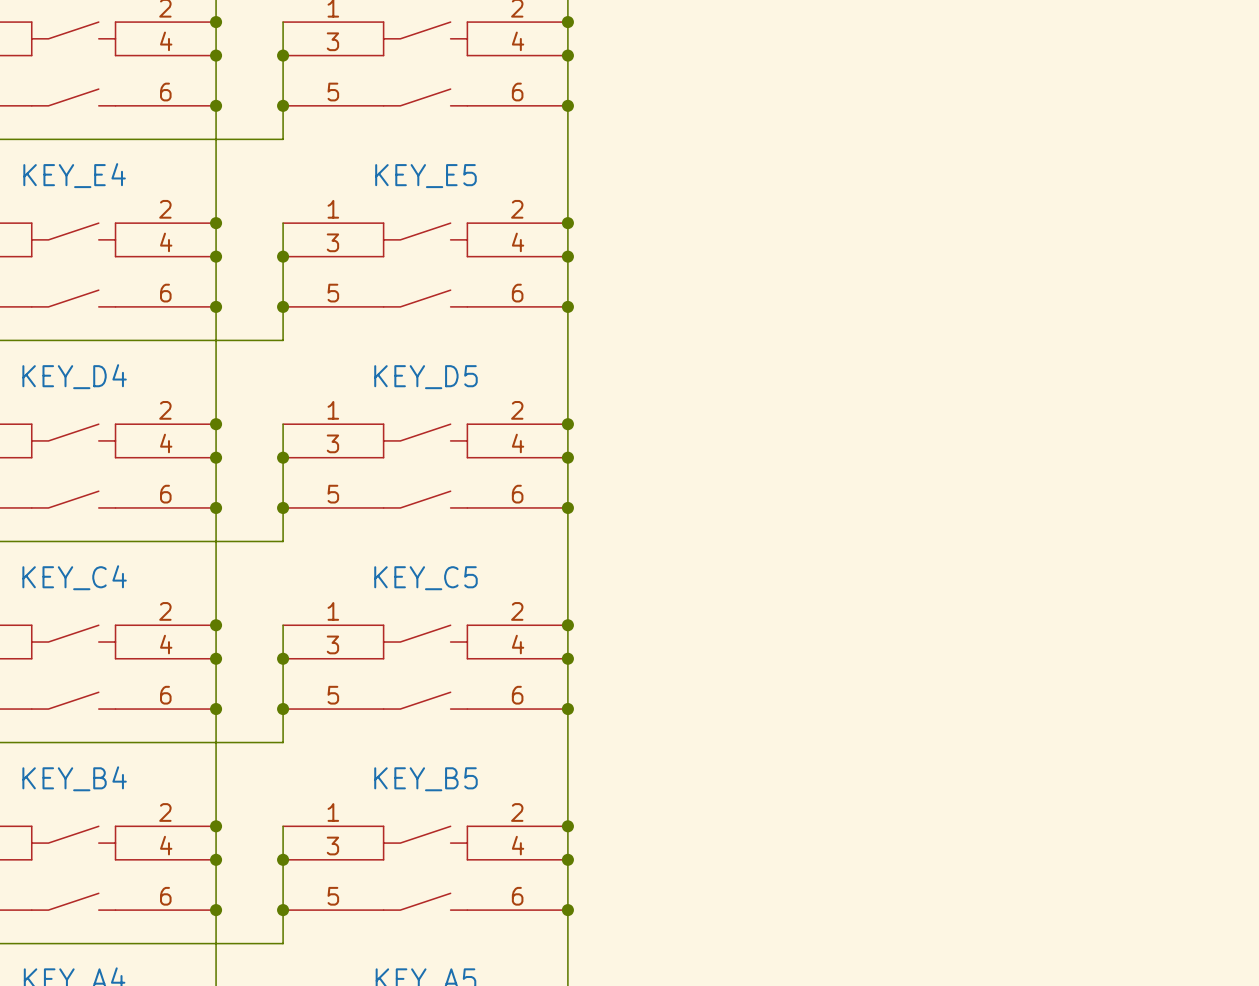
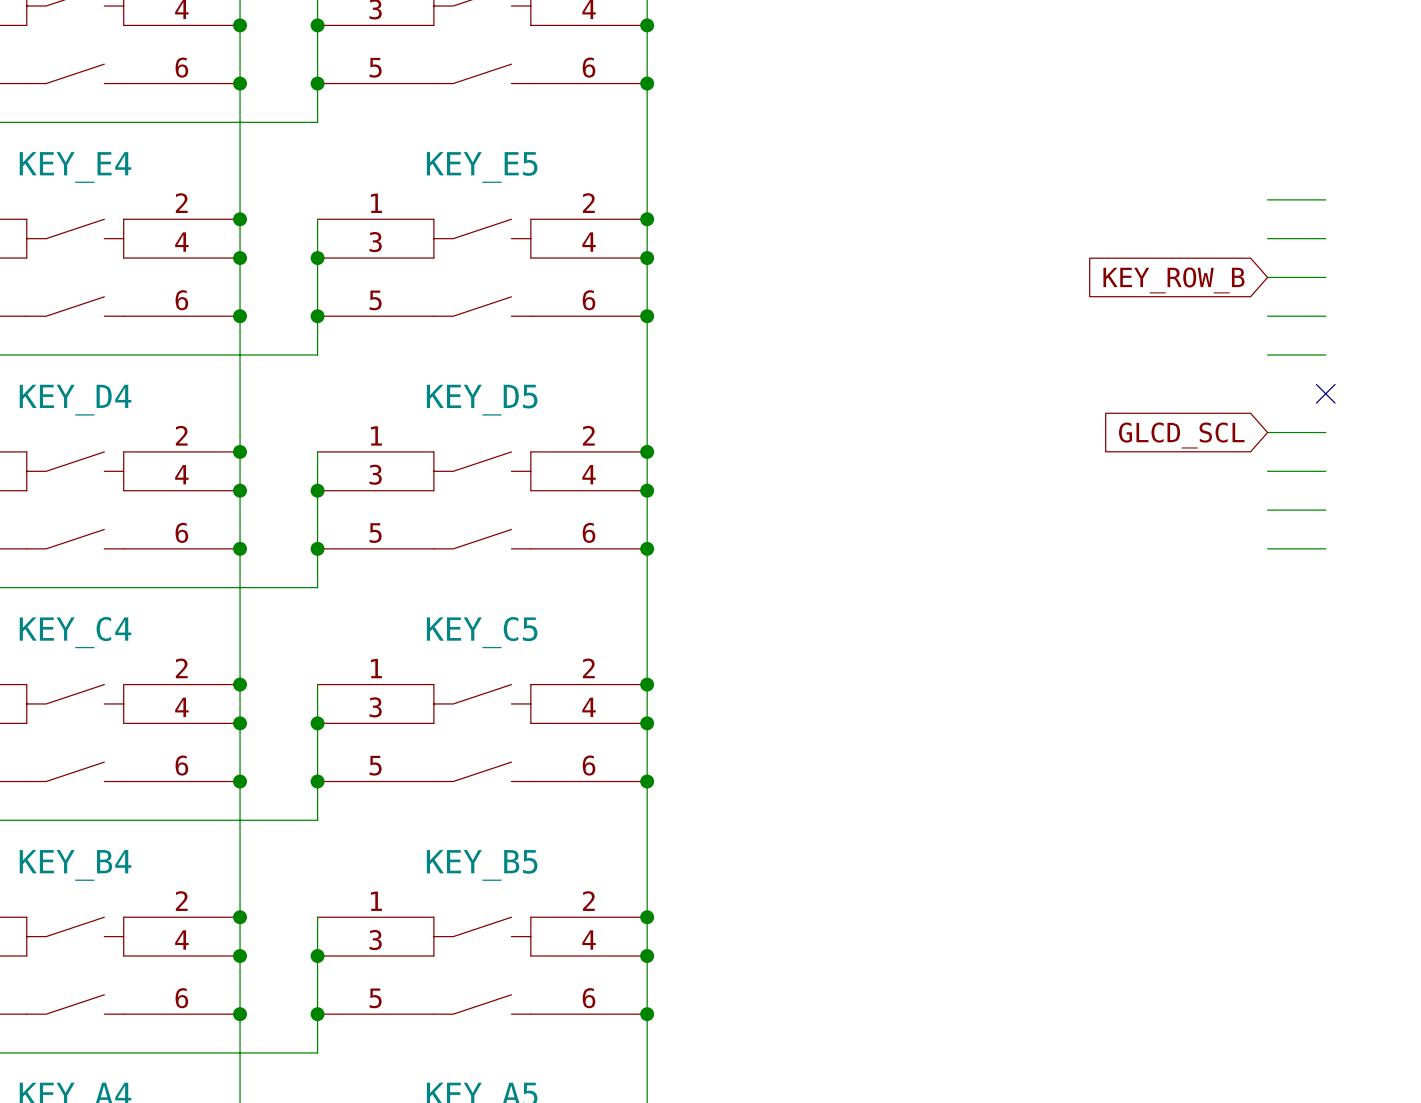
wire: none -> (1267, 199) (1325, 199)
wire: none -> (1267, 238) (1325, 238)
wire: none -> (1267, 277) (1325, 277)
global label: none -> KEY_ROW_B (1173, 280)
wire: none -> (1267, 316) (1325, 316)
wire: none -> (1267, 354) (1325, 354)
no-connect mark: none -> (1325, 393)
wire: none -> (1267, 432) (1325, 432)
global label: none -> GLCD_SCL (1181, 435)
wire: none -> (1267, 471) (1325, 471)
wire: none -> (1267, 510) (1325, 510)
wire: none -> (1267, 548) (1325, 548)

